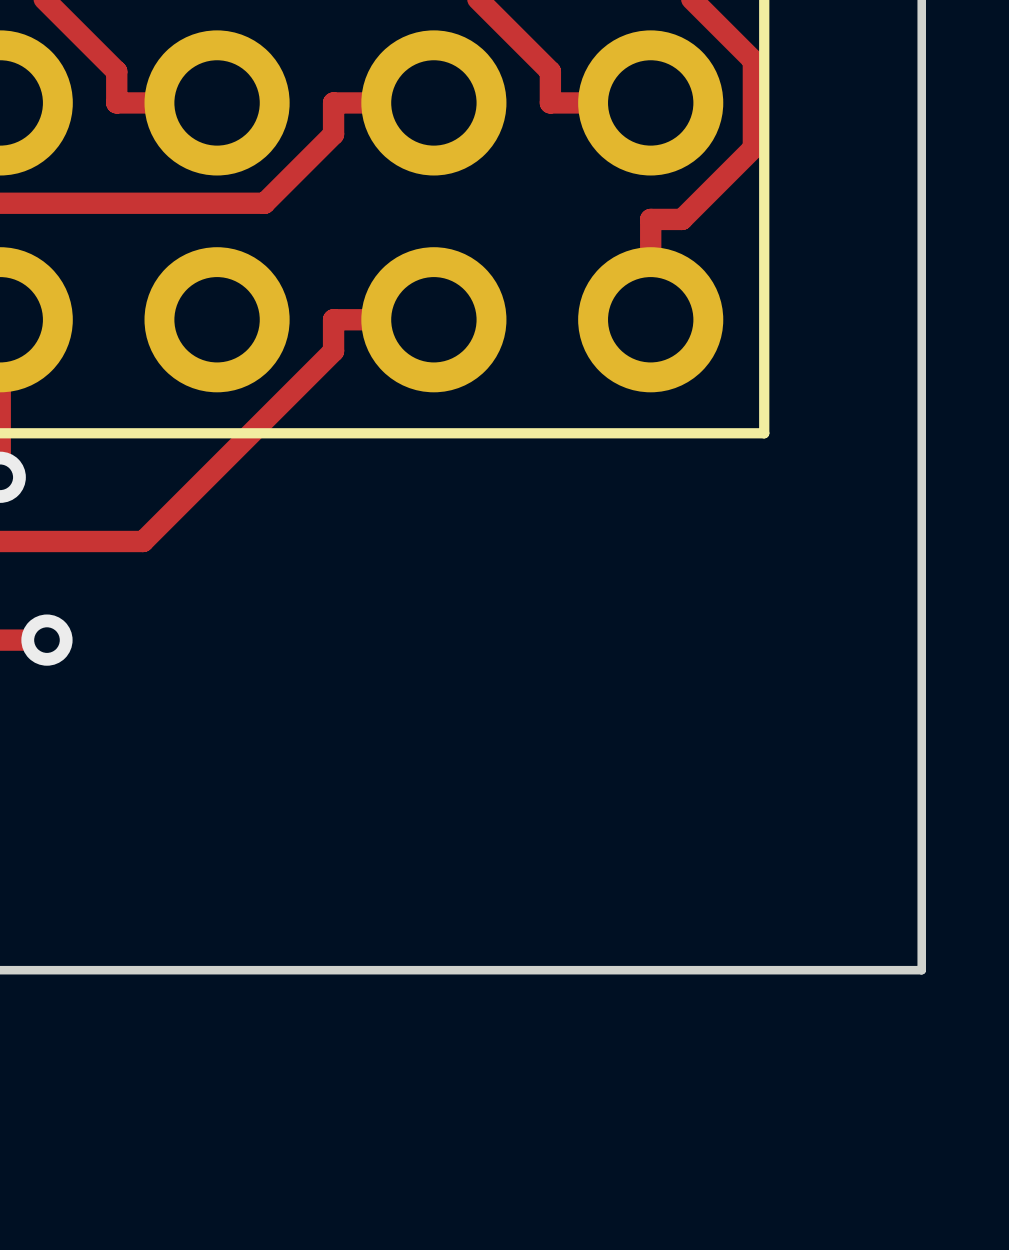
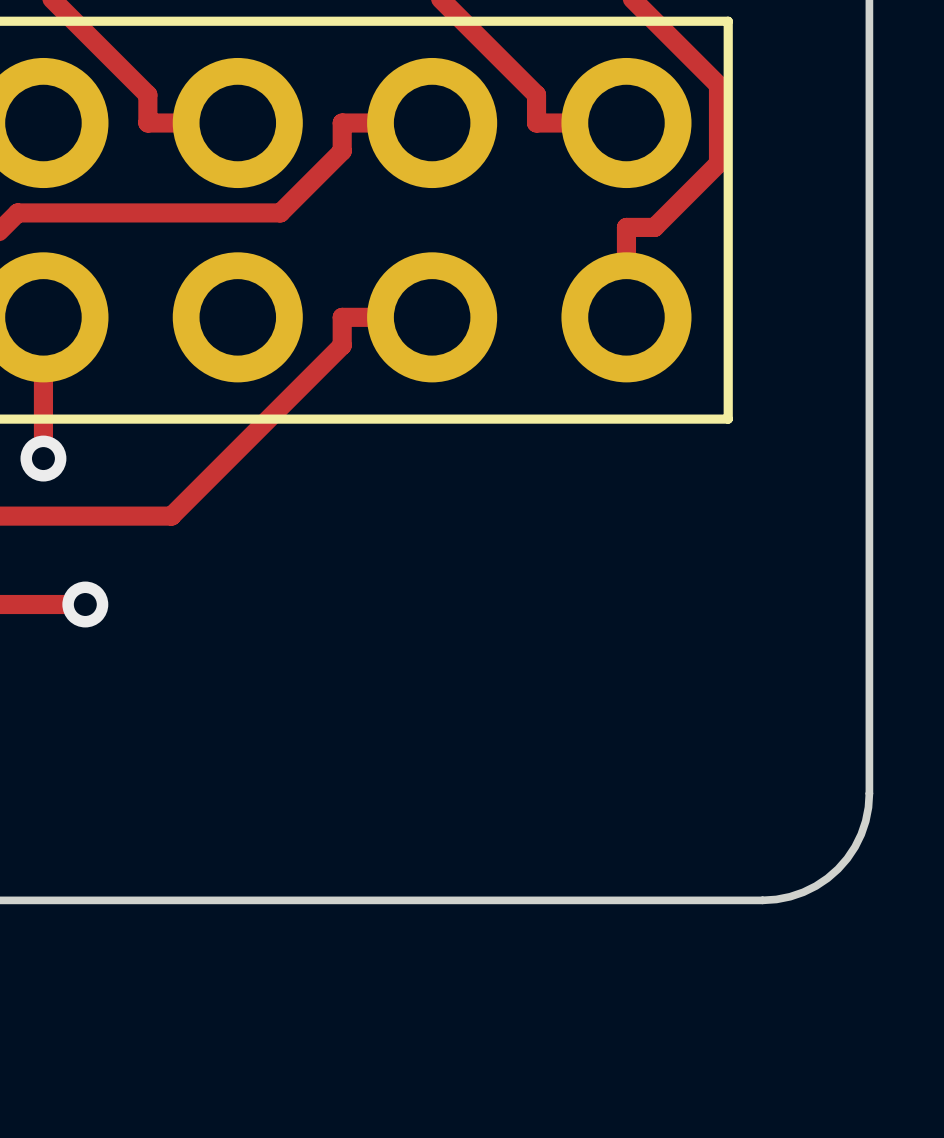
board edge: (921, 850) (921, 970) (802, 970) -> (869, 793) (865, 821) (861, 834) (847, 858) (838, 869) (827, 878) (803, 892) (790, 896) (762, 900)

